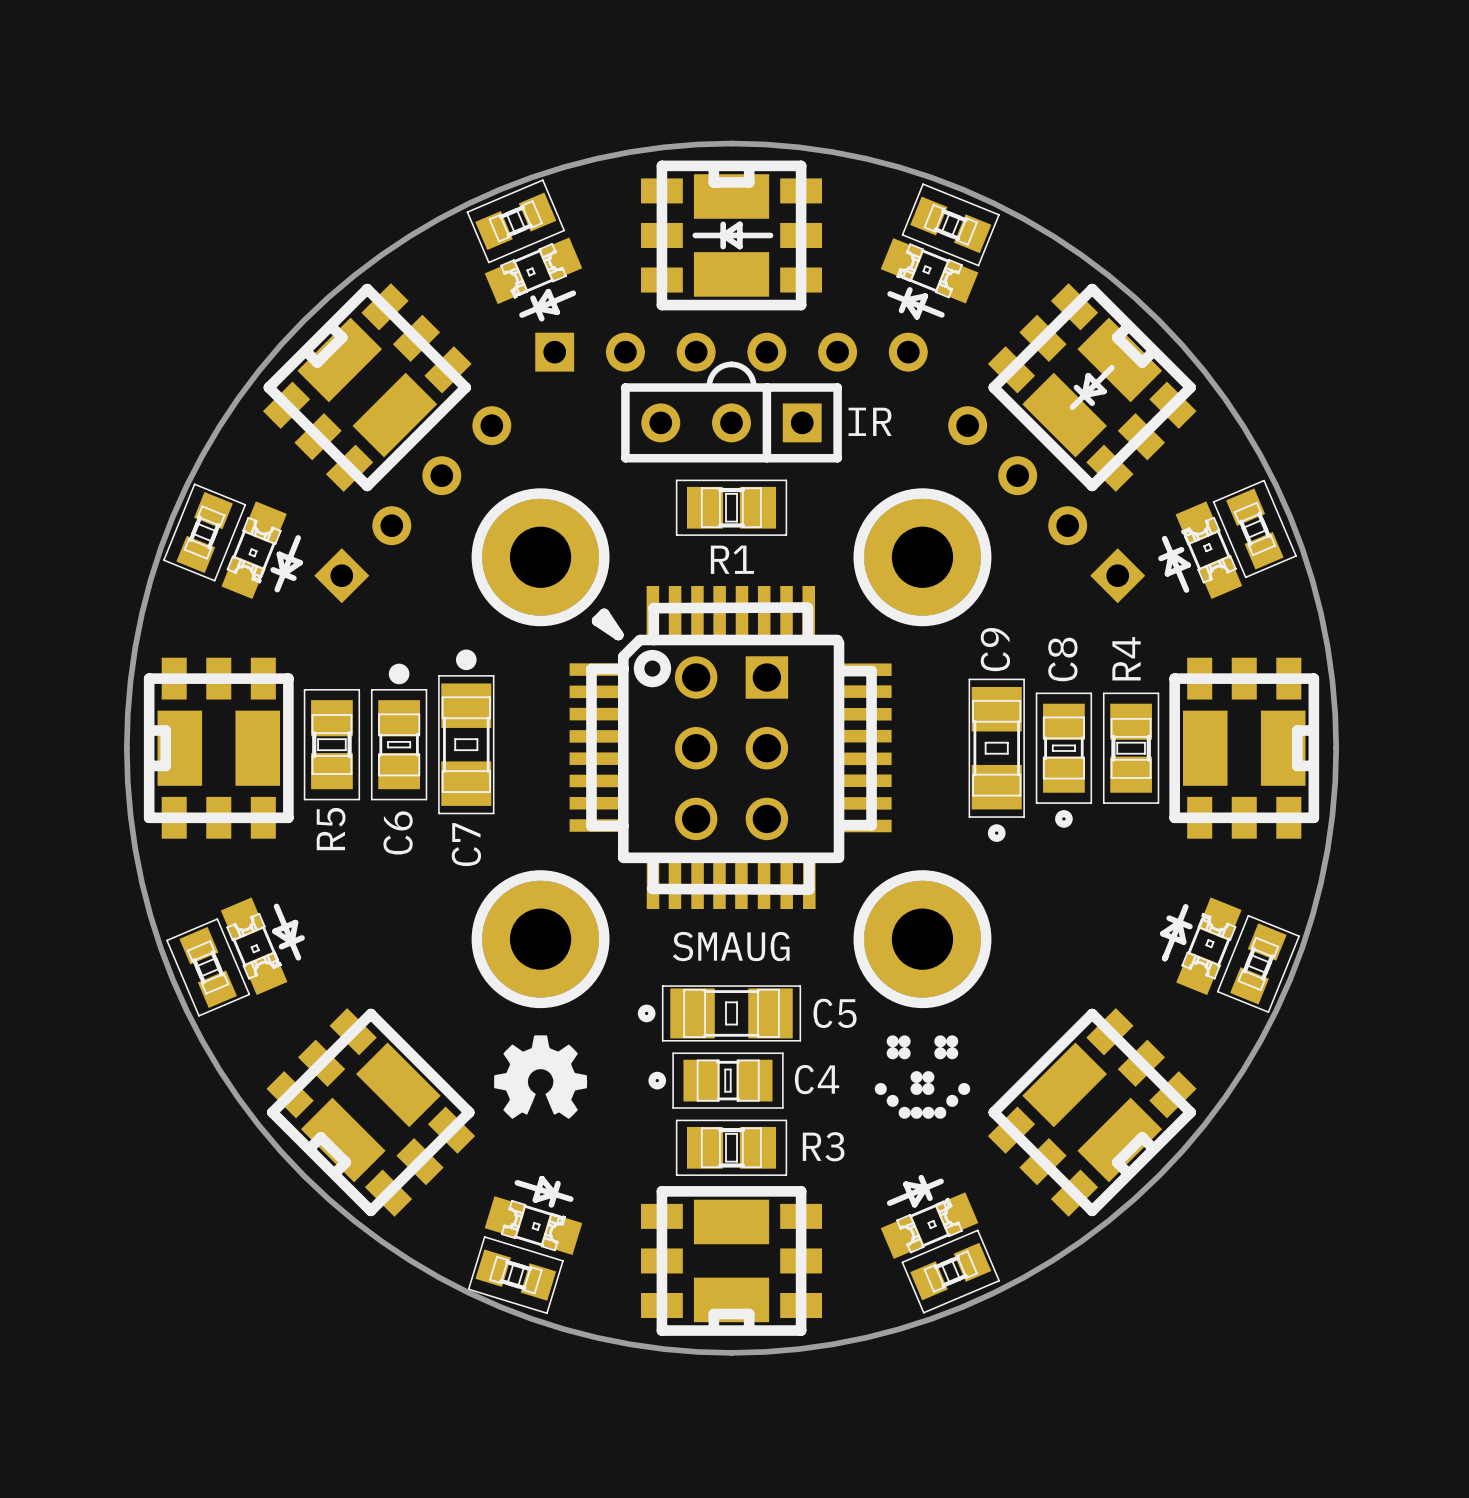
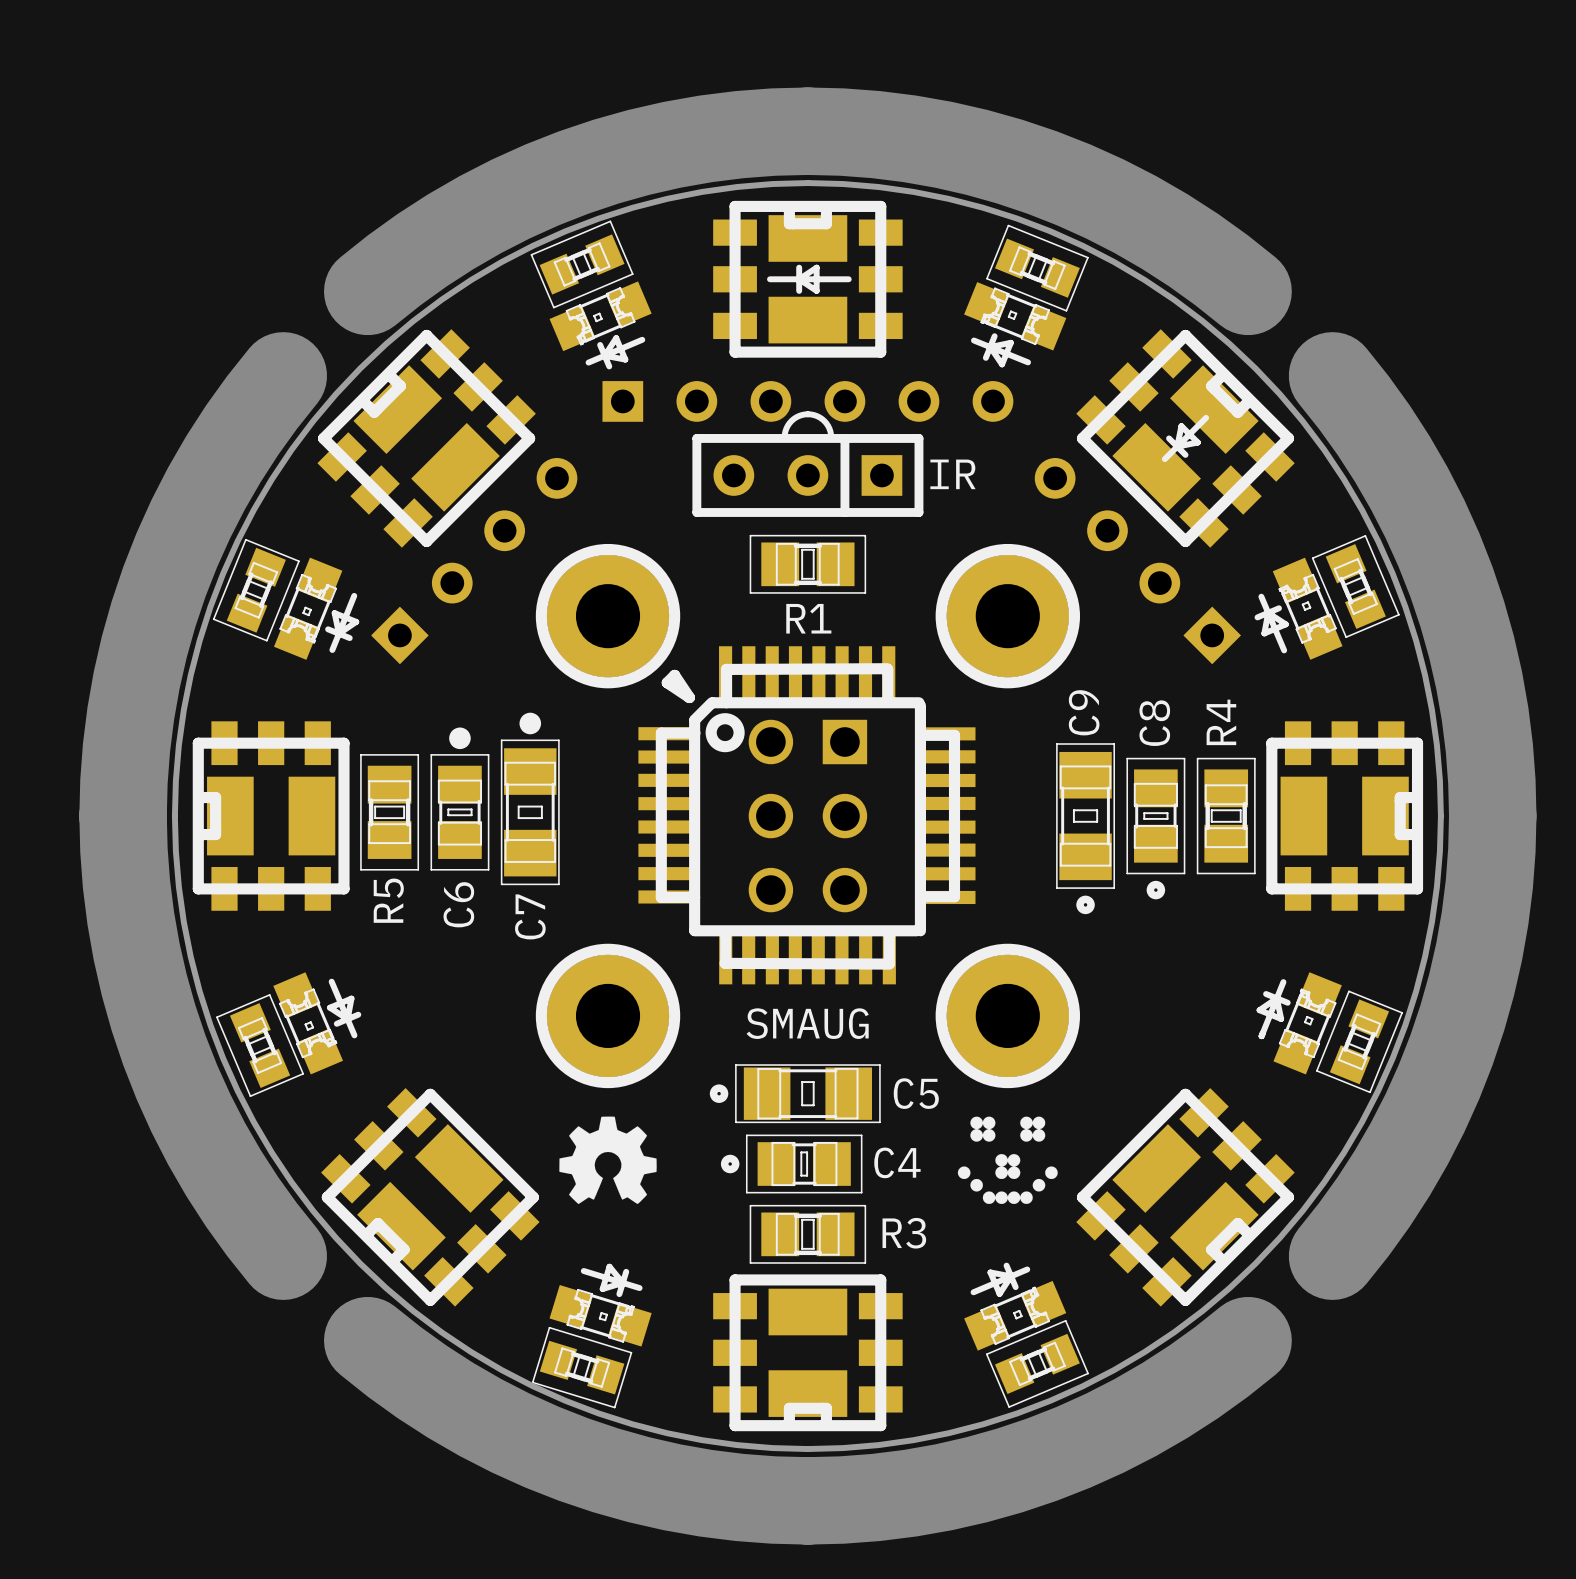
line: none -> (367, 291) (394, 270) (450, 231) (510, 199) (573, 172) (606, 161) (672, 144) (739, 134) (807, 131) (876, 134) (943, 144) (1009, 161) (1042, 172) (1105, 199) (1165, 231) (1221, 270) (1248, 291)
line: none -> (283, 375) (262, 402) (223, 458) (190, 518) (164, 581) (153, 614) (136, 680) (126, 747) (123, 816) (126, 884) (136, 951) (153, 1017) (164, 1050) (190, 1113) (223, 1173) (262, 1229) (283, 1256)
line: none -> (1332, 375) (1373, 430) (1409, 488) (1424, 518) (1451, 581) (1462, 614) (1479, 680) (1489, 747) (1492, 816) (1489, 884) (1479, 951) (1462, 1017) (1451, 1050) (1424, 1113) (1409, 1143) (1373, 1201) (1332, 1256)
line: none -> (367, 1340) (394, 1361) (450, 1400) (510, 1433) (573, 1459) (606, 1470) (672, 1487) (739, 1497) (807, 1500) (876, 1497) (943, 1487) (1009, 1470) (1042, 1459) (1105, 1433) (1165, 1400) (1221, 1361) (1248, 1340)

